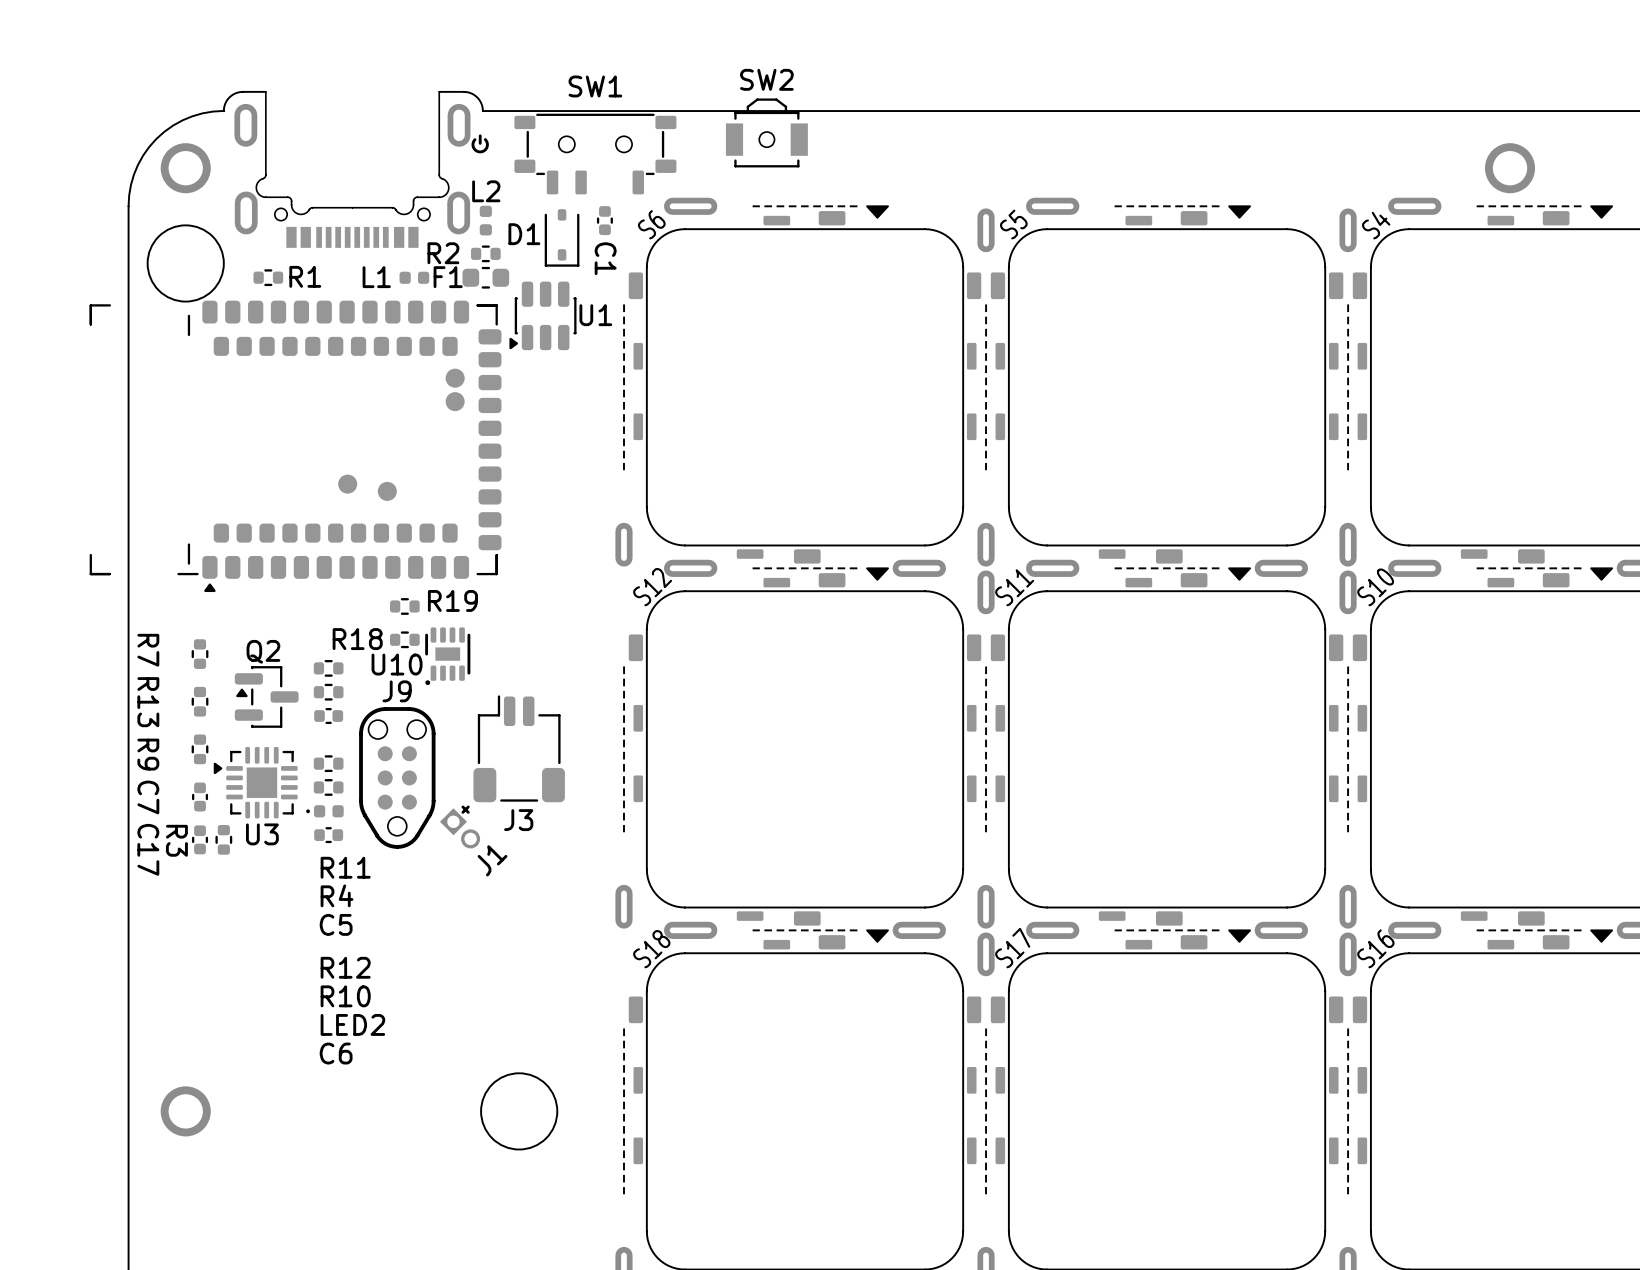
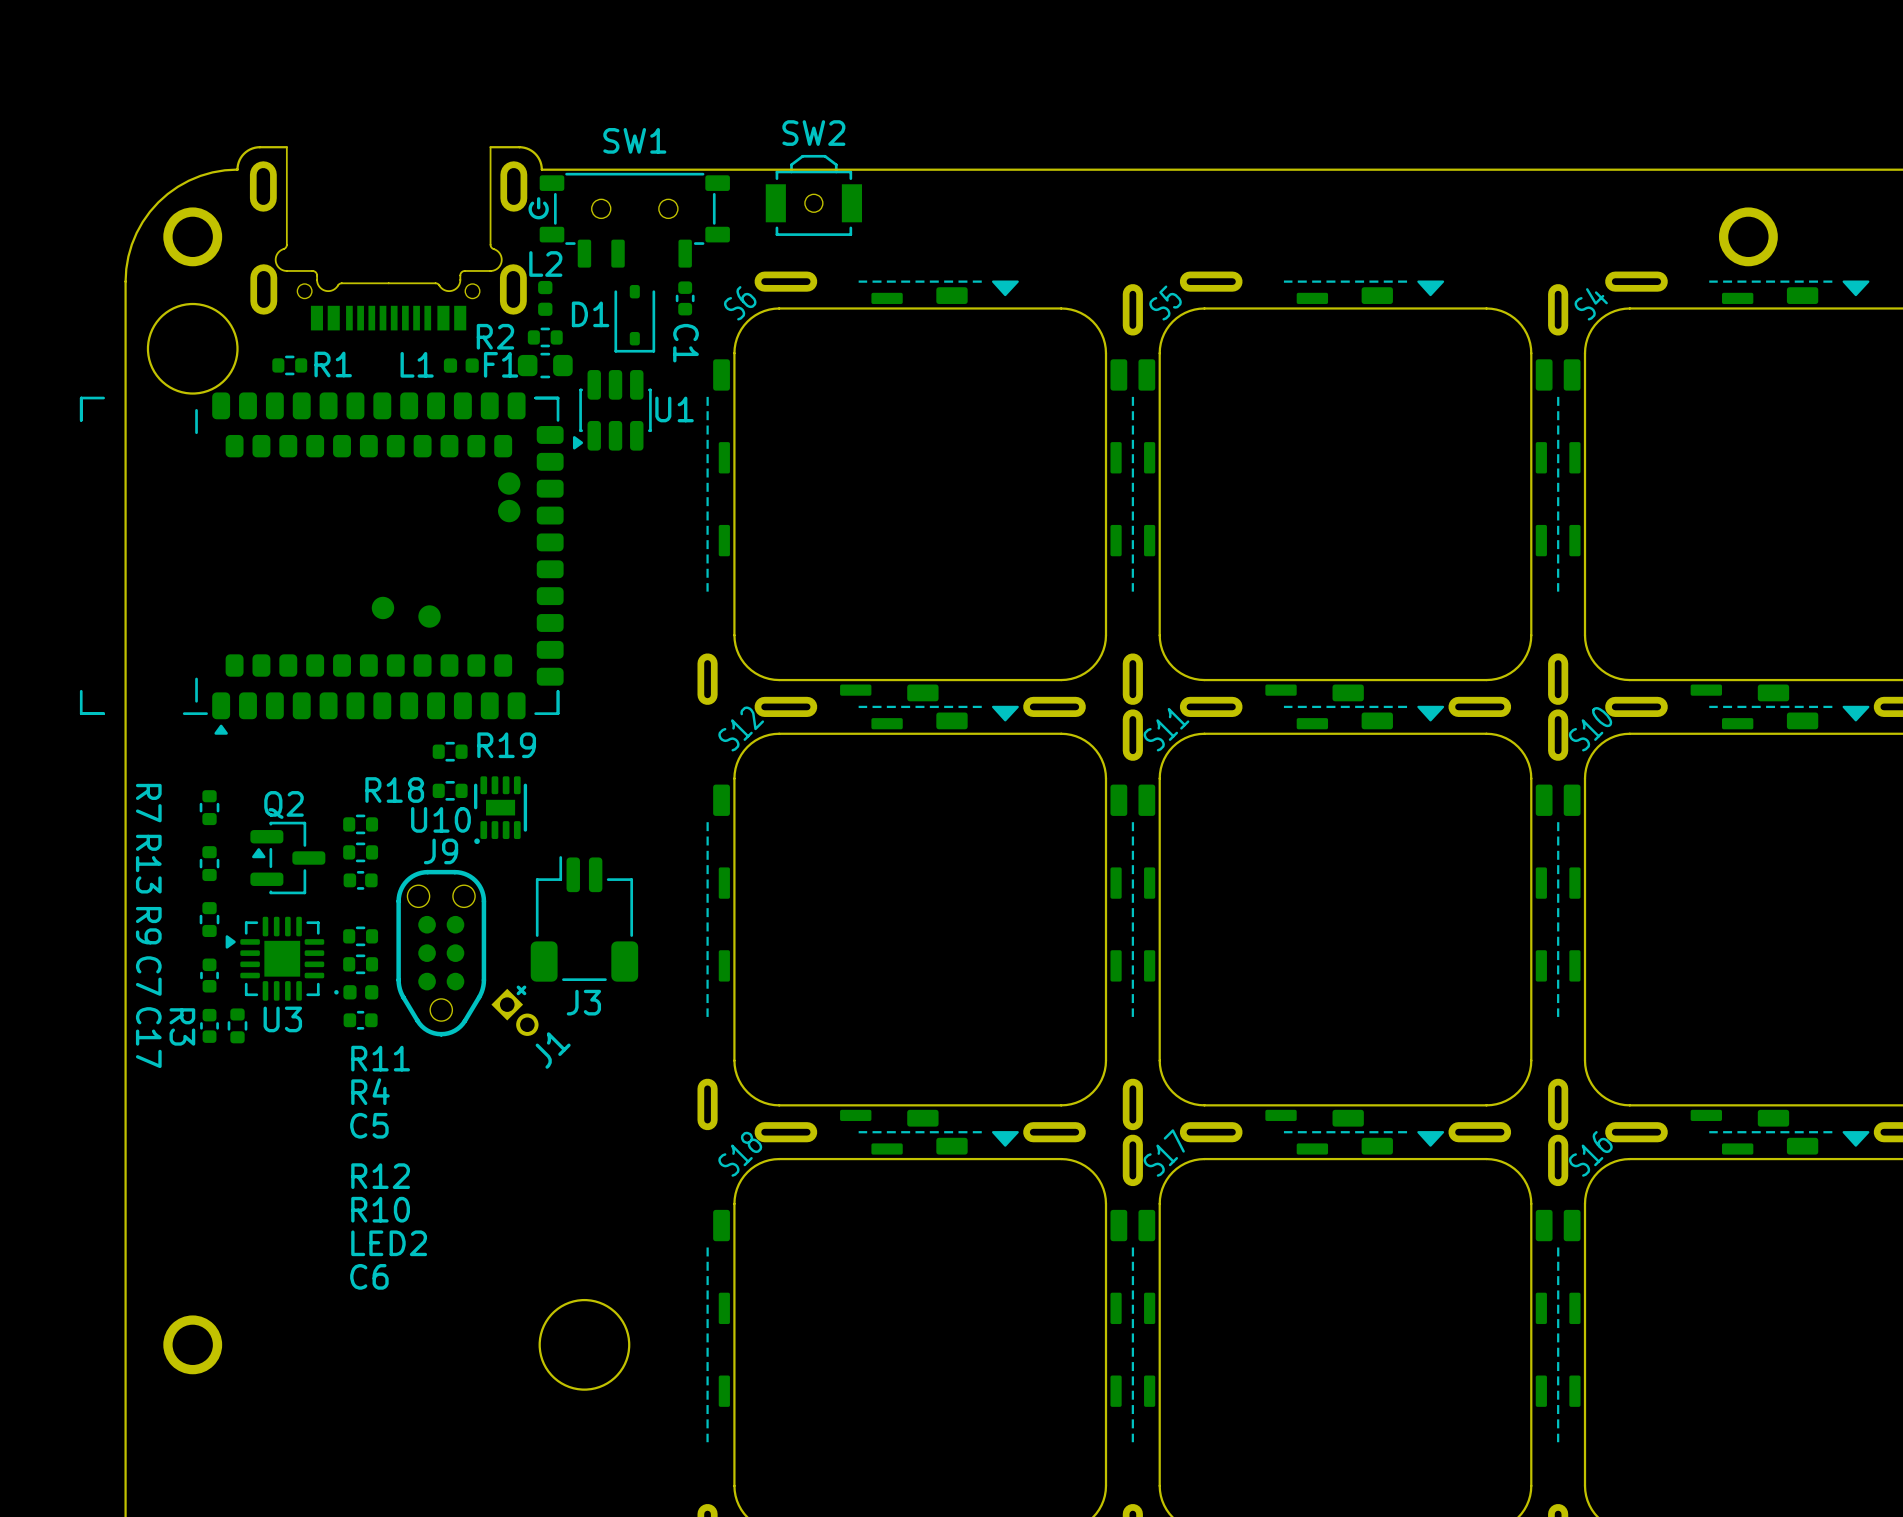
SW2 position: (766, 132) -> (813, 195)
SW1 position: (595, 154) -> (634, 220)

